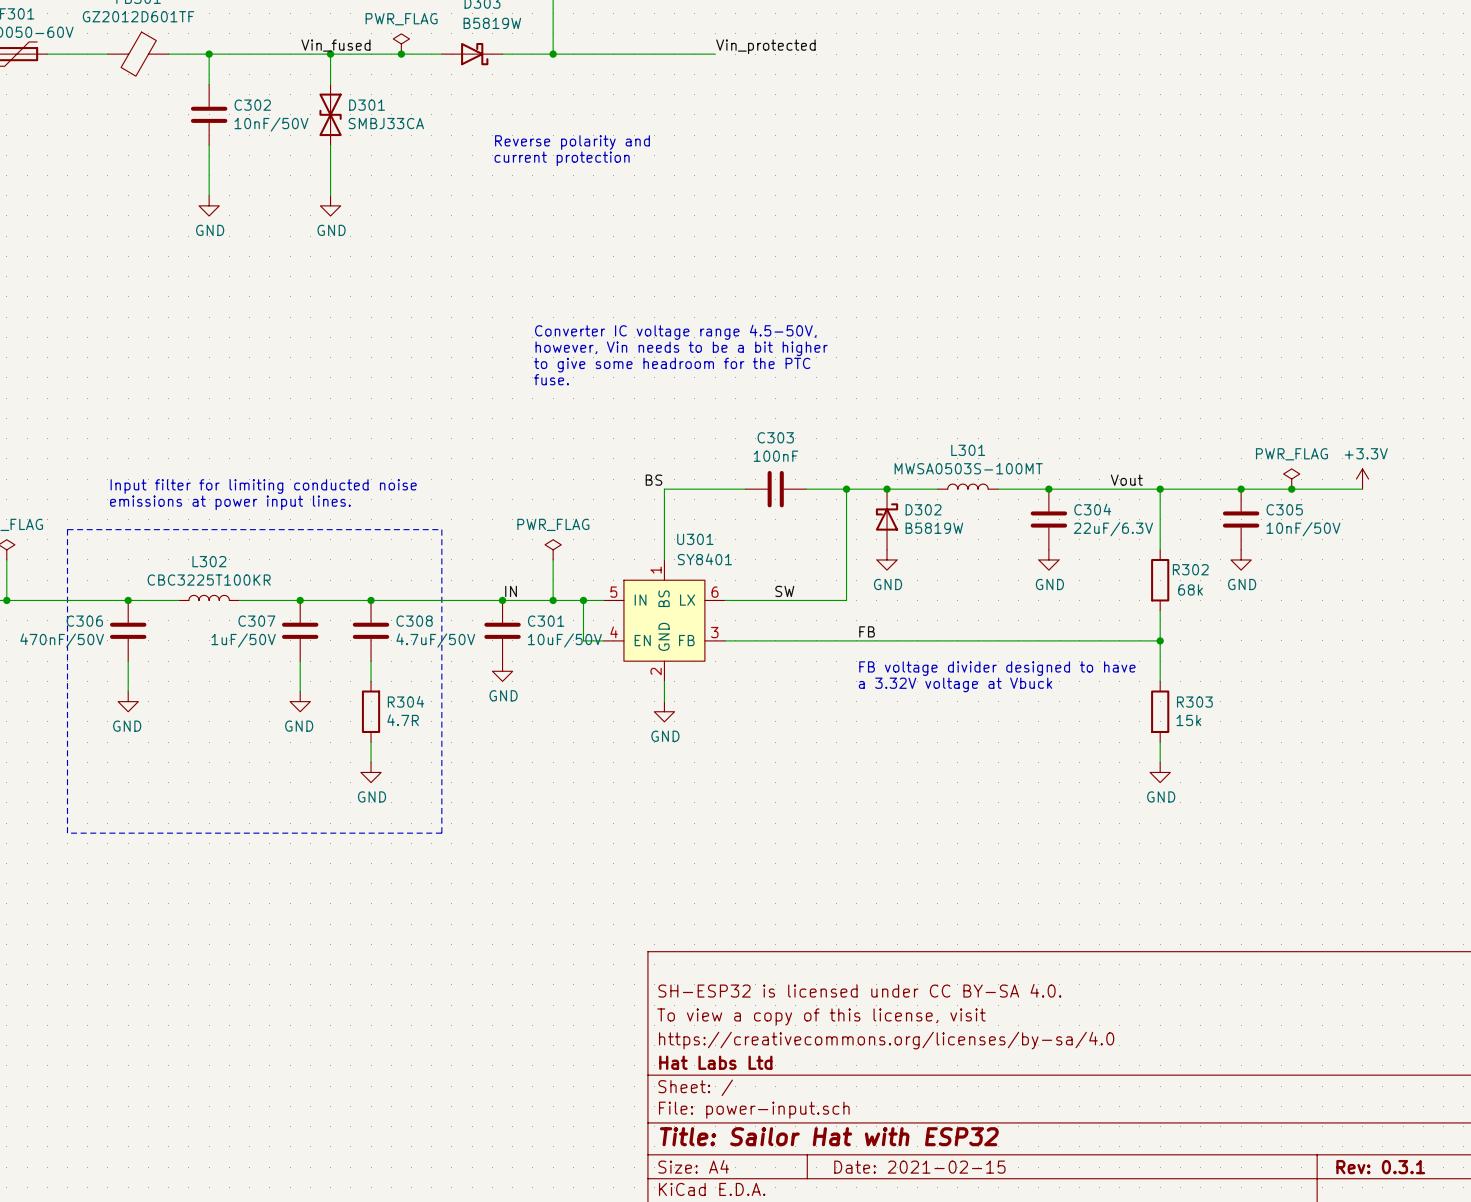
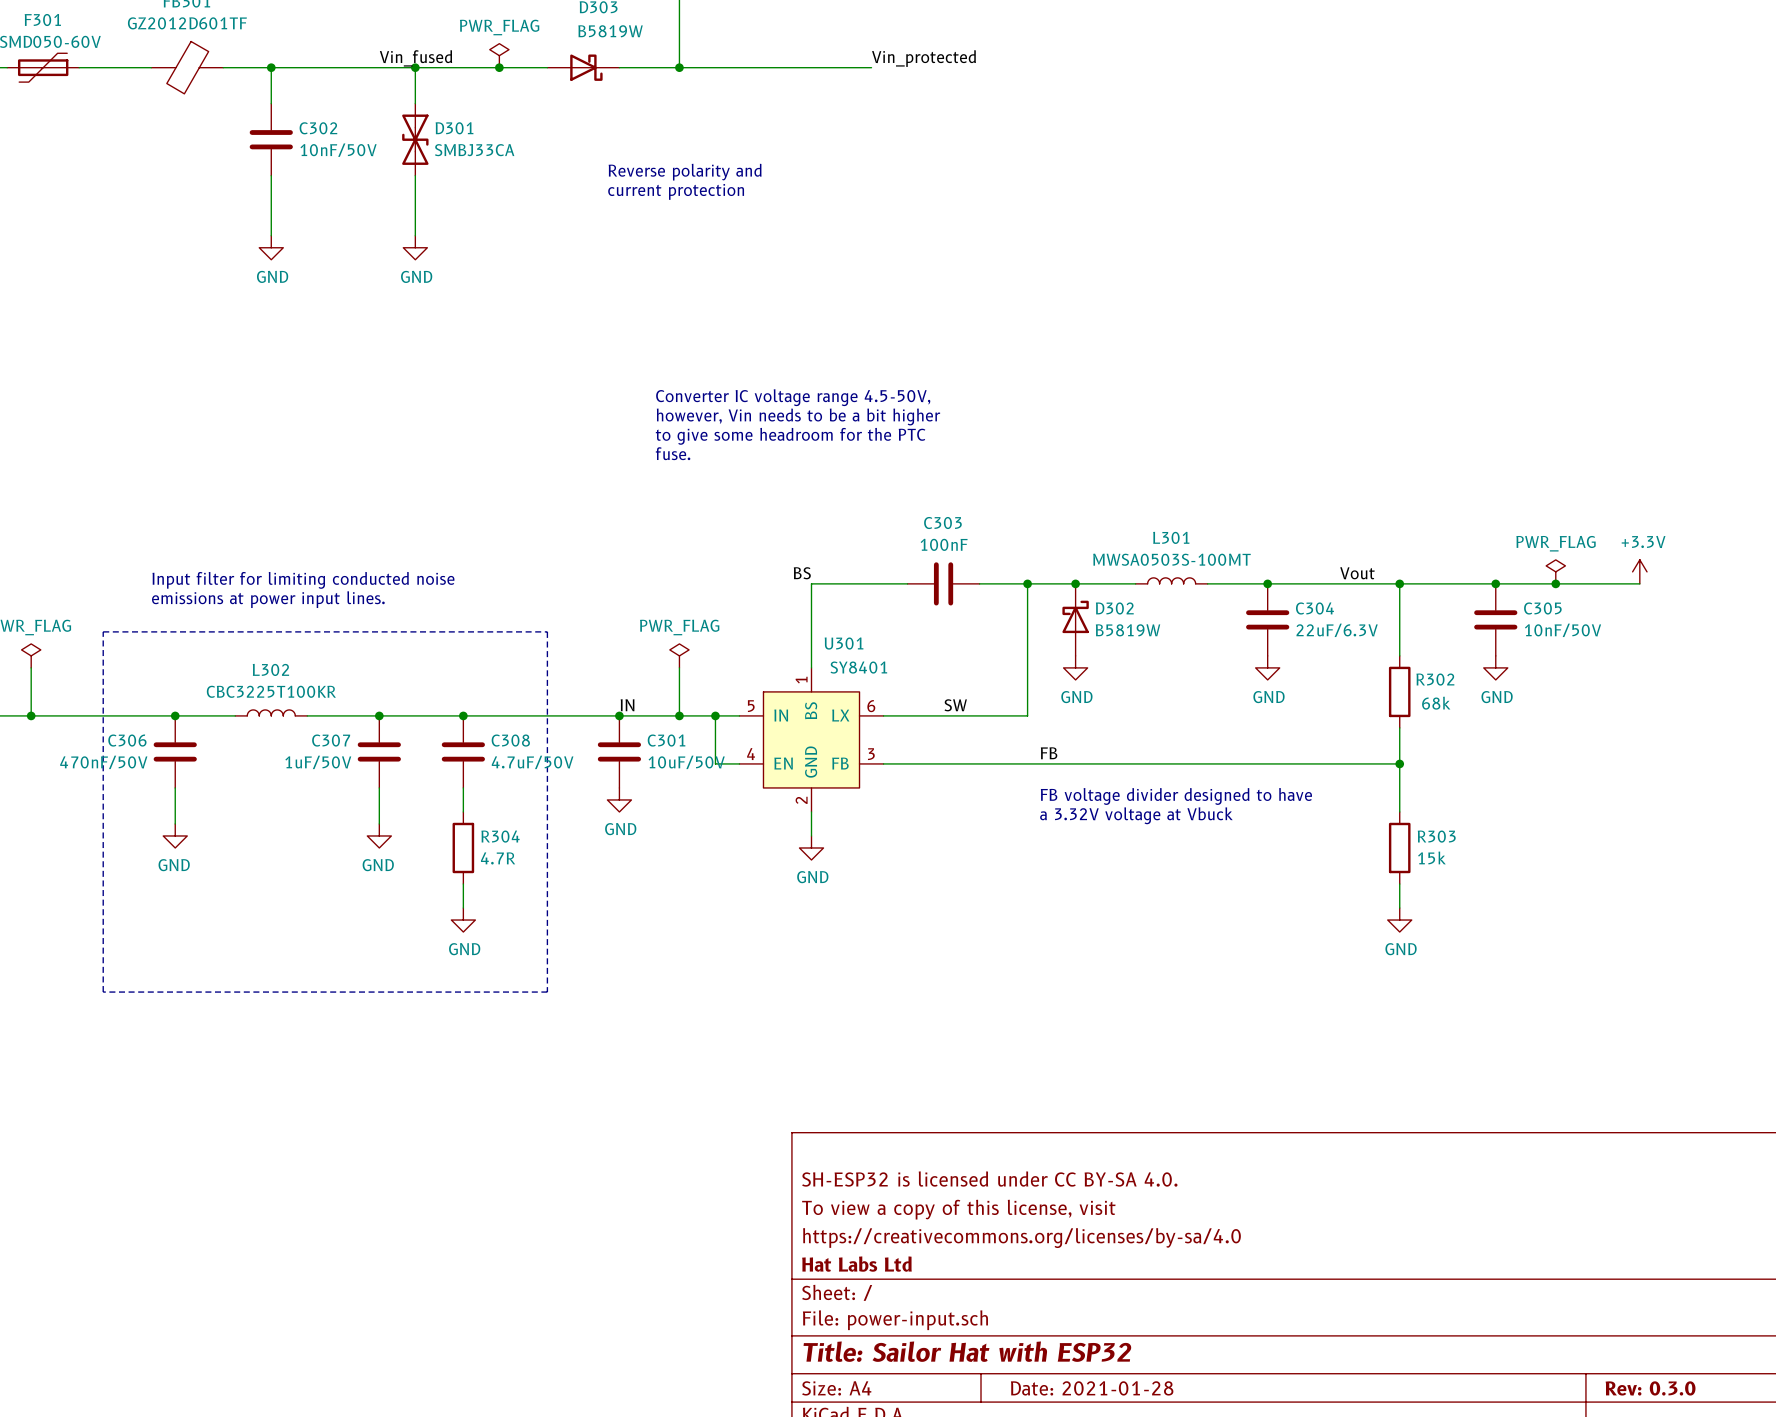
title block: Date: 2021-02-15 (919, 1167) -> Date: 2021-01-28 (1092, 1388)
title block: Rev: 0.3.1 (1380, 1167) -> Rev: 0.3.0 (1650, 1388)

